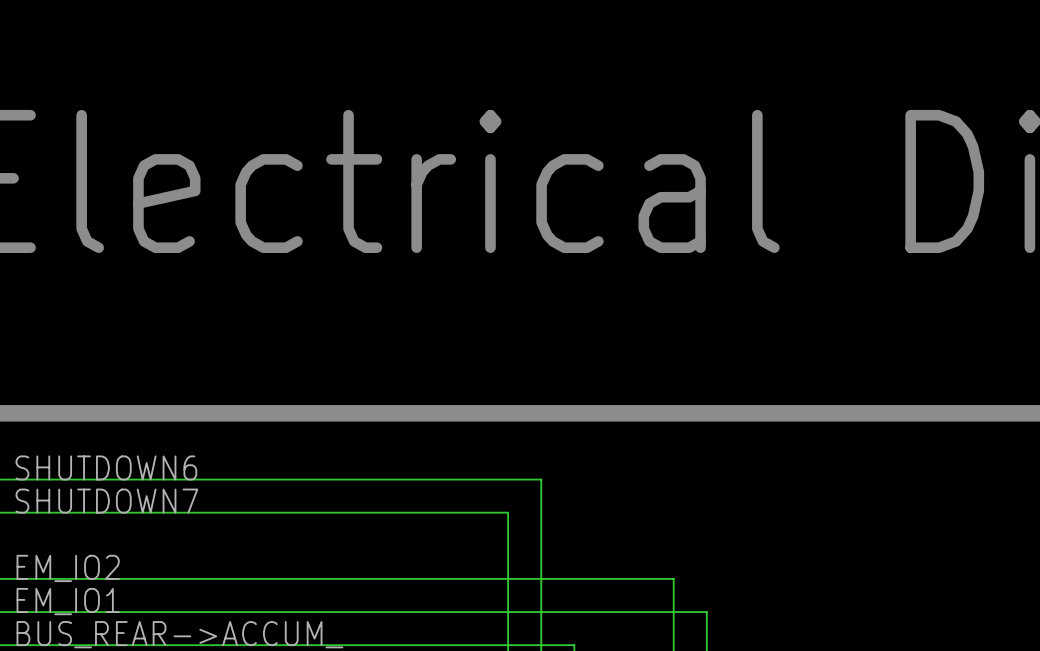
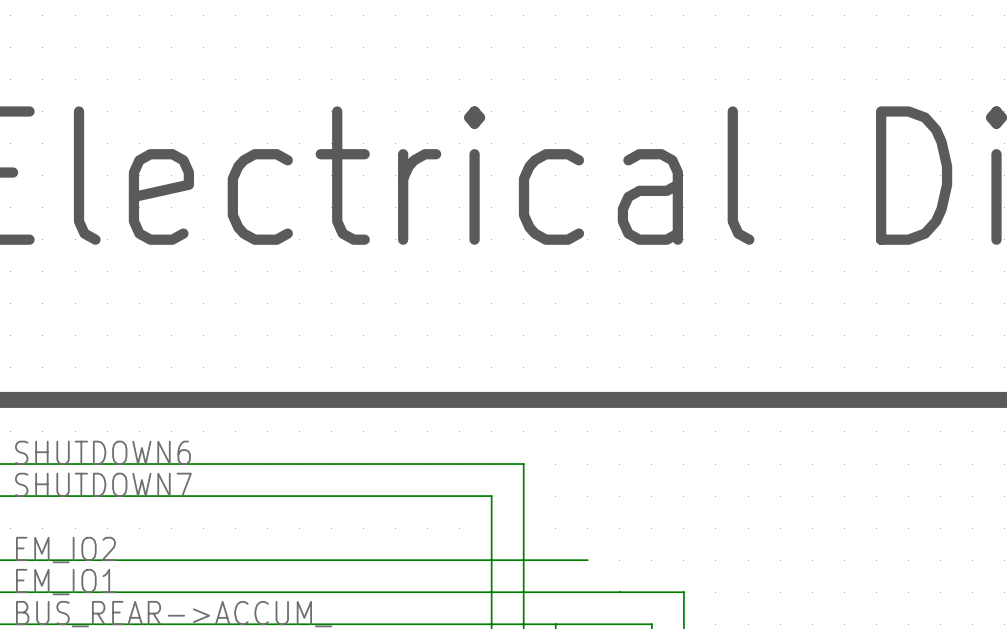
wire: (607, 578) (673, 578) (673, 645) -> (555, 624) (651, 624)

